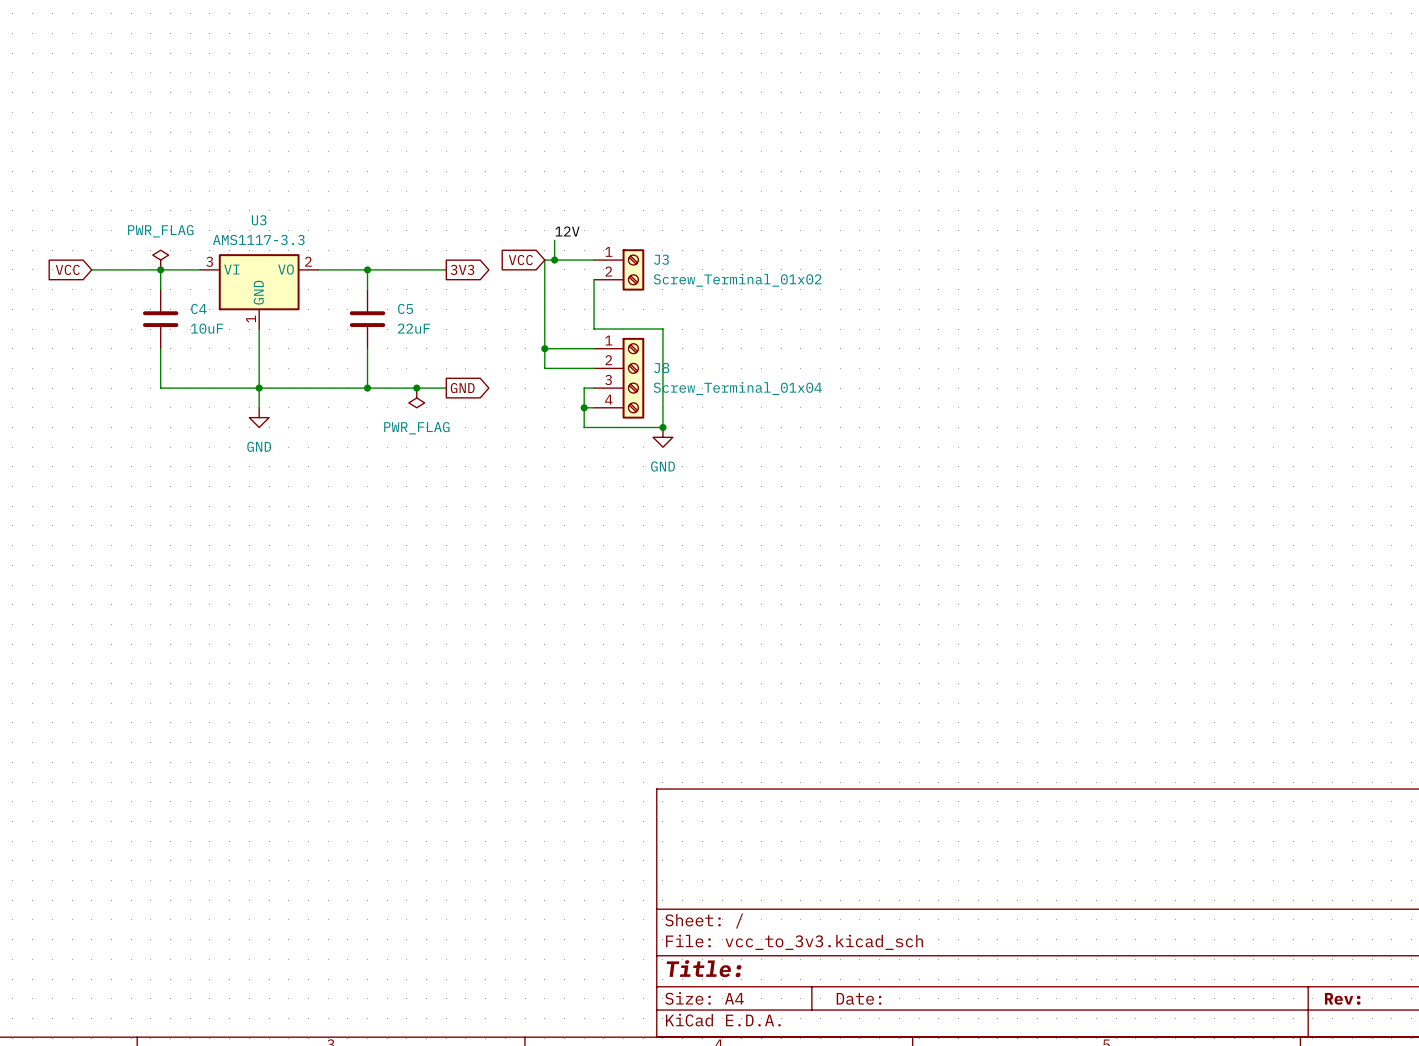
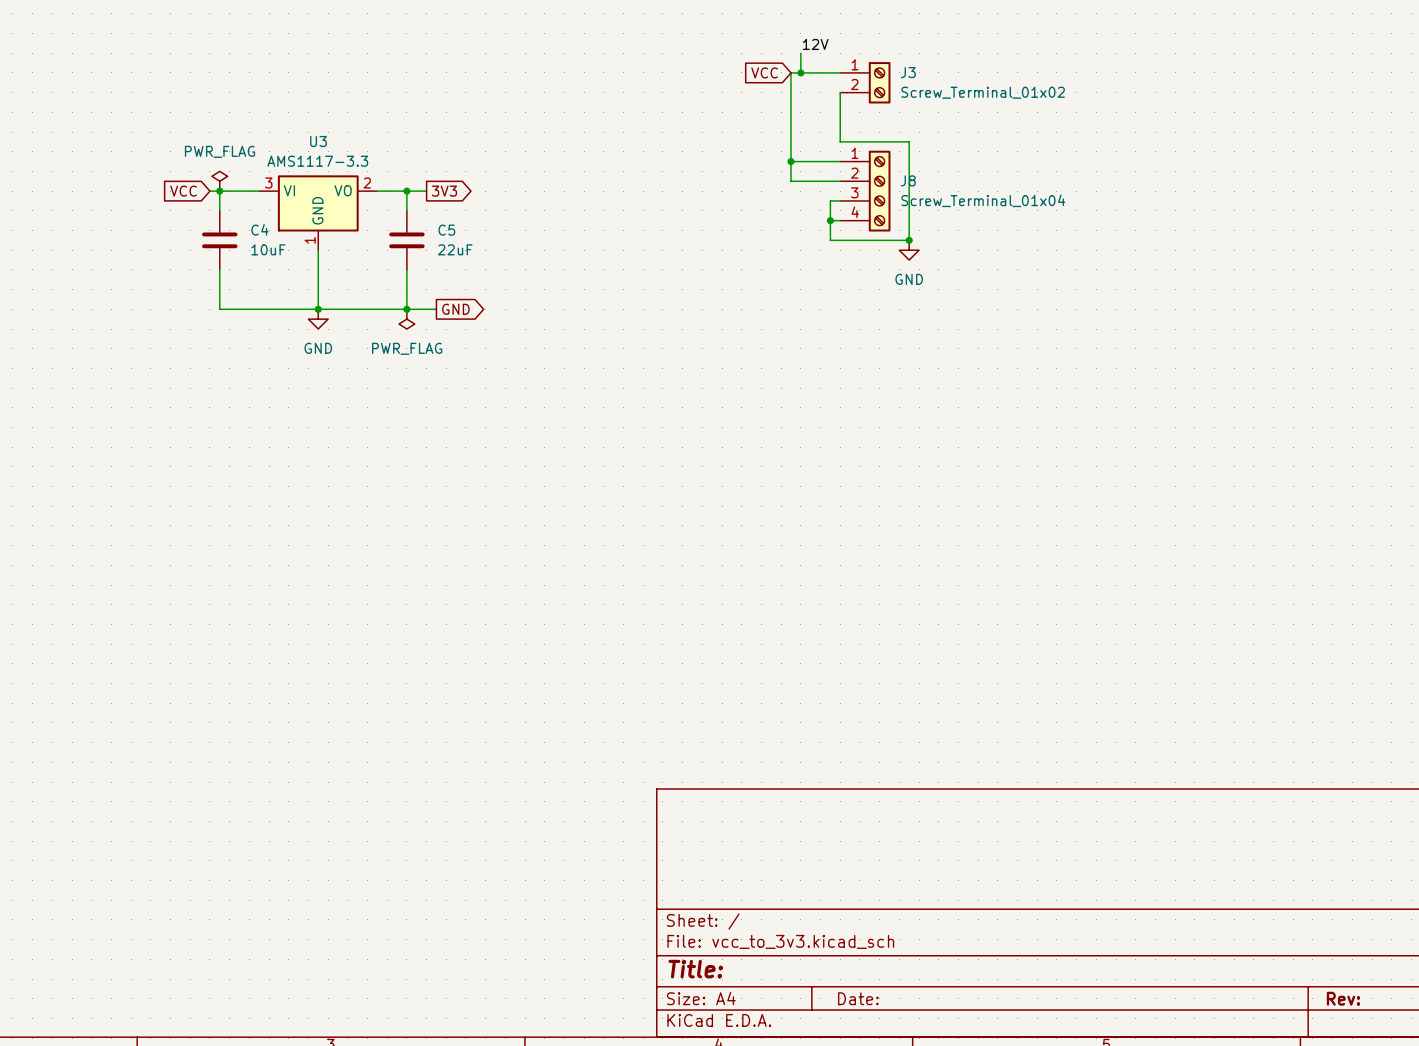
label: none -> 12V (815, 44)
wire: none -> (800, 53) (800, 72)
global label: none -> VCC (764, 72)
junction: none -> (800, 72)
wire: none -> (840, 72) (791, 72) (791, 181) (840, 181)
wire: none -> (840, 92) (840, 141) (909, 141) (909, 240) (830, 240) (830, 200) (840, 200)
wire: none -> (791, 161) (840, 161)
junction: none -> (791, 161)
wire: none -> (209, 191) (259, 191)
junction: none -> (219, 191)
wire: none -> (377, 191) (426, 191)
junction: none -> (406, 191)
wire: none -> (830, 220) (840, 220)
junction: none -> (830, 220)
label: 12V (567, 231) -> none
wire: (554, 240) (554, 260) -> none
junction: none -> (909, 240)
wire: none -> (318, 250) (318, 309)
power symbol: none -> GND (909, 250)
power symbol position: PWR_FLAG (160, 260) -> PWR_FLAG (219, 181)
global label: VCC (520, 260) -> none
junction: (554, 260) -> none
wire: (594, 260) (544, 260) (544, 368) (594, 368) -> none
global label position: VCC (67, 269) -> VCC (183, 191)
wire: (91, 269) (200, 269) -> none
wire: (160, 269) (160, 289) -> (219, 191) (219, 210)
junction: (160, 269) -> none
wire: none -> (219, 269) (219, 309) (436, 309)
wire: (318, 269) (446, 269) -> none
wire: (367, 269) (367, 289) -> (406, 191) (406, 210)
junction: (367, 269) -> none
global label position: 3V3 (462, 269) -> 3V3 (444, 191)
J3 position: (619, 269) -> (865, 82)
wire: (594, 279) (594, 329) (662, 329) (662, 427) (584, 427) (584, 388) (594, 388) -> none
U3 position: (259, 291) -> (318, 212)
junction: none -> (318, 309)
junction: none -> (406, 309)
C4 position: (160, 319) -> (219, 240)
C5 position: (367, 319) -> (406, 240)
wire: (259, 329) (259, 407) -> none
wire: (160, 348) (160, 388) (446, 388) -> none
wire: (367, 348) (367, 388) -> (406, 269) (406, 309)
wire: (544, 348) (594, 348) -> none
junction: (544, 348) -> none
J8 position: (619, 378) -> (865, 191)
junction: (259, 388) -> none
junction: (367, 388) -> none
junction: (416, 388) -> none
global label position: GND (462, 388) -> GND (455, 309)
power symbol position: PWR_FLAG (416, 397) -> PWR_FLAG (406, 319)
wire: (584, 407) (594, 407) -> none
junction: (584, 407) -> none
power symbol position: GND (259, 417) -> GND (318, 319)
junction: (662, 427) -> none
power symbol: GND (662, 437) -> none

